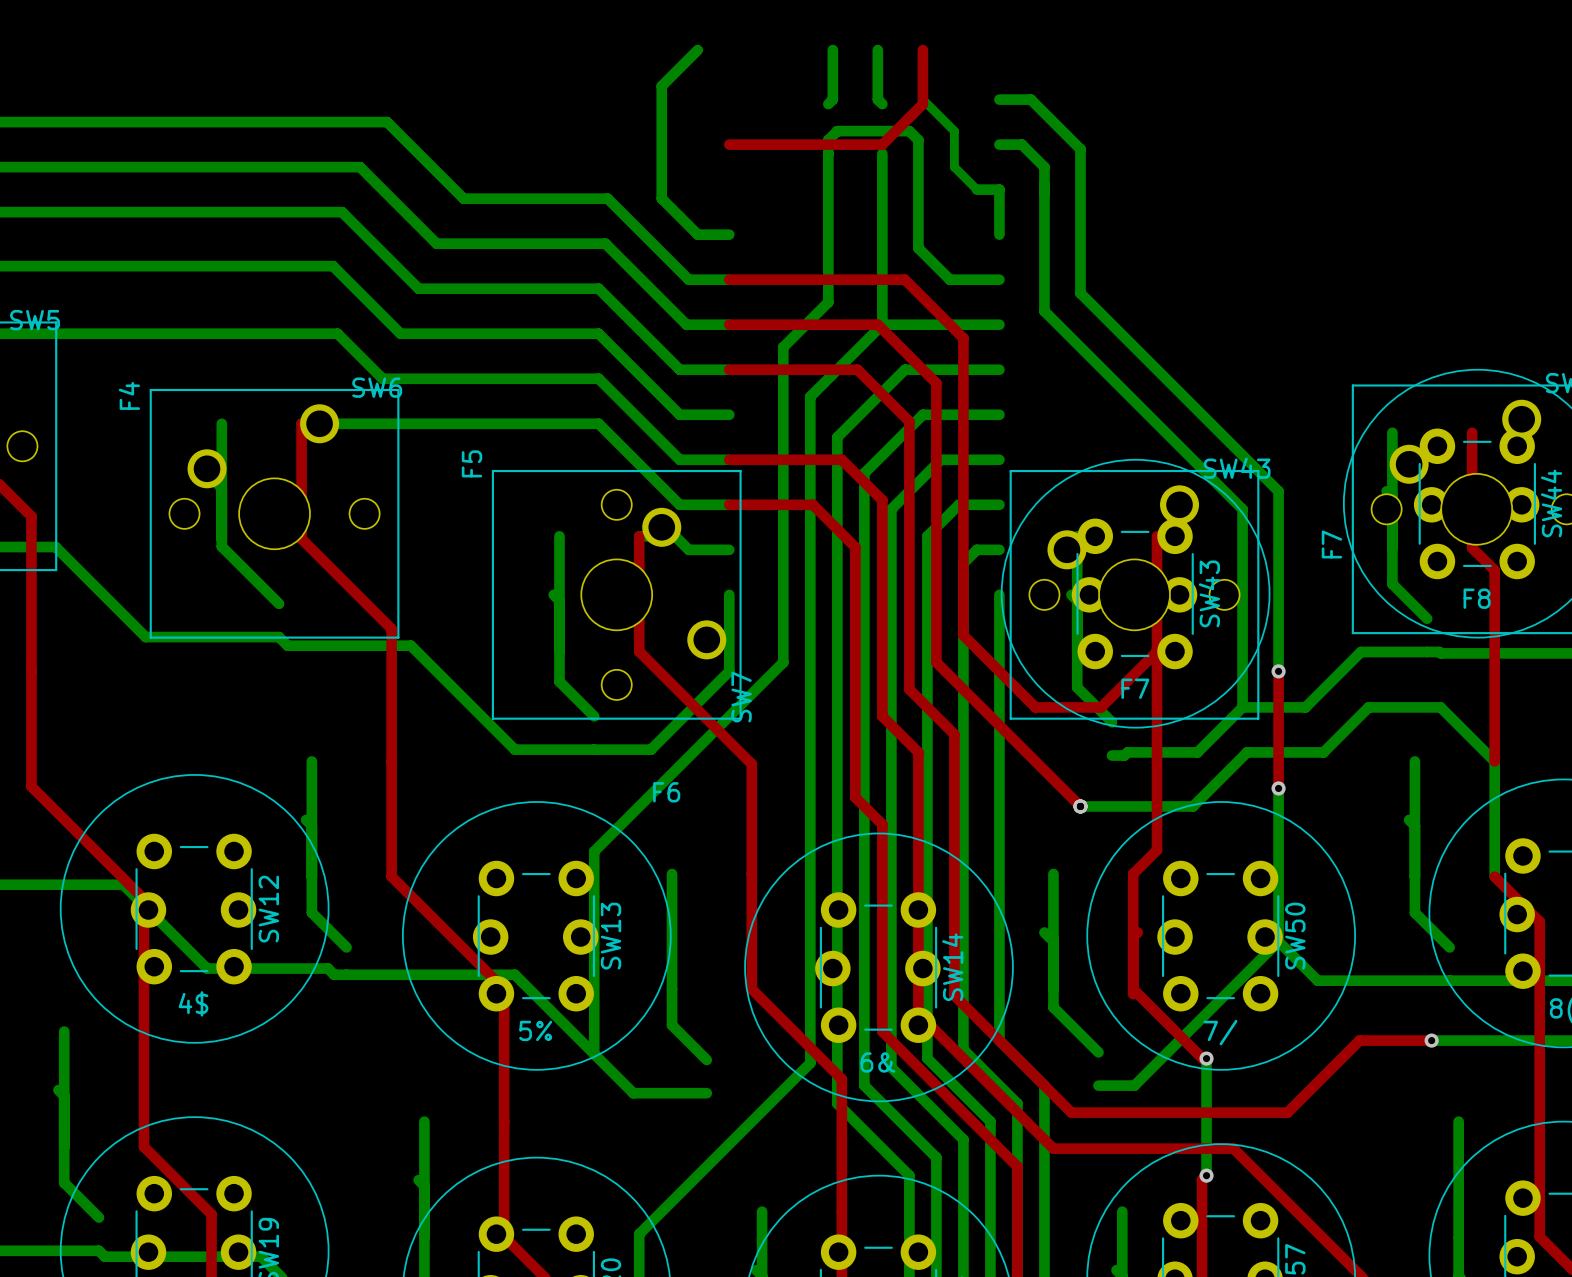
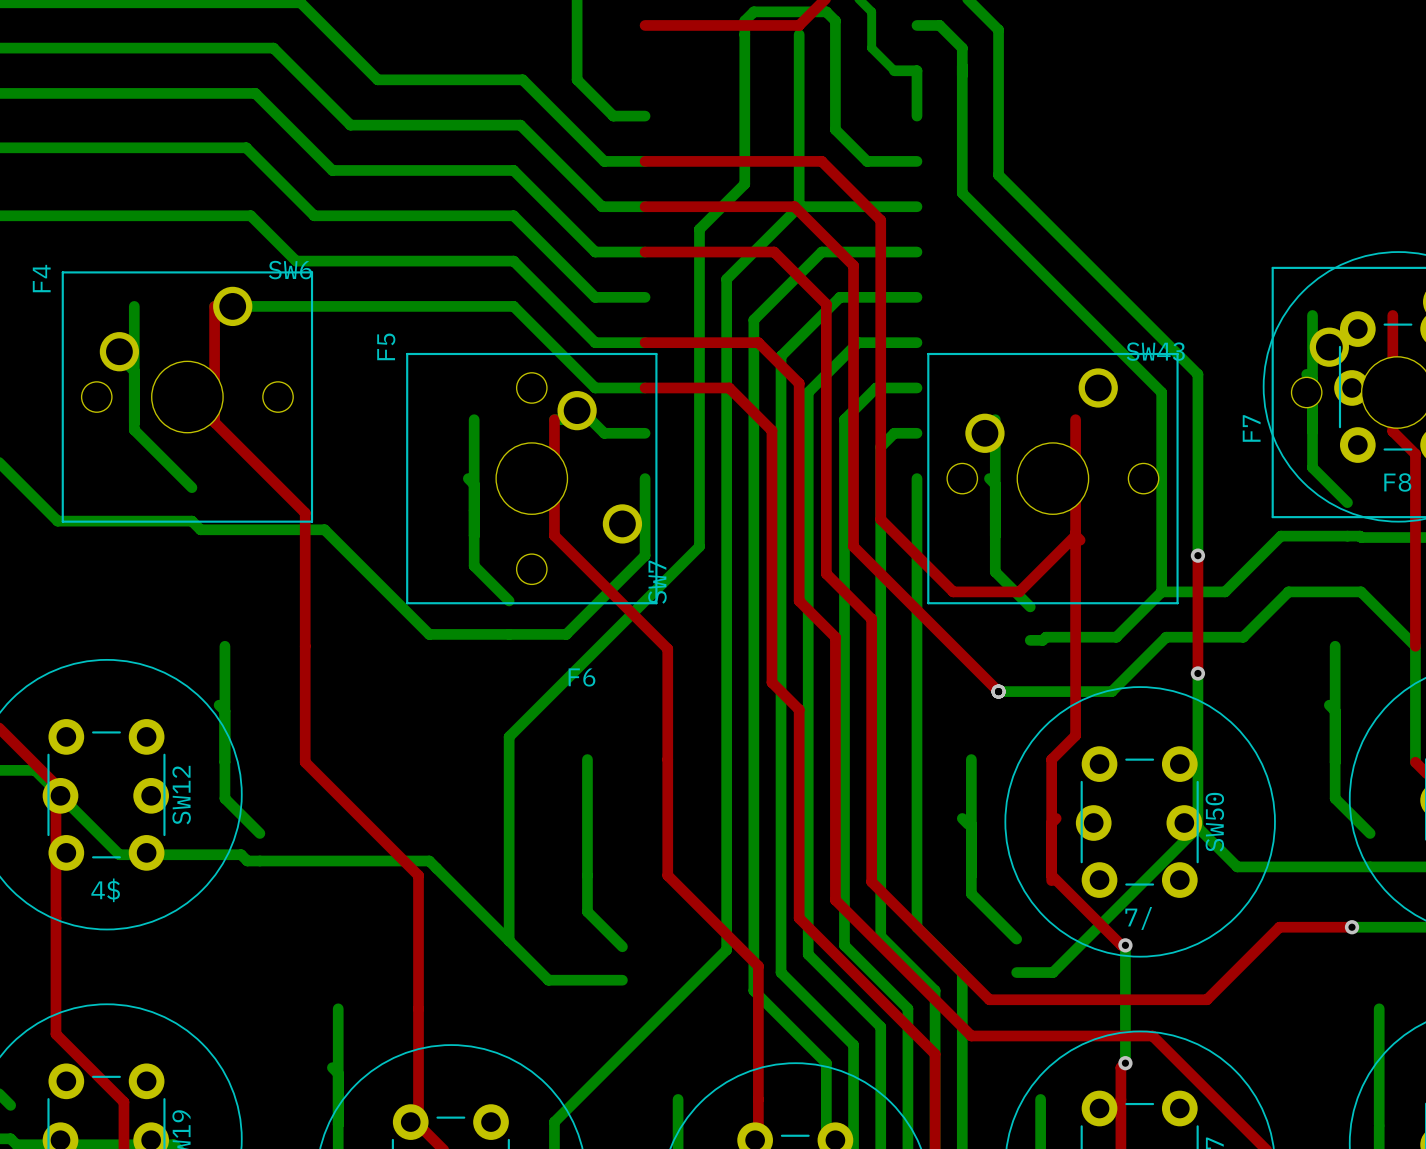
SW43: F7 (1135, 593) -> none
SW13: 5% (536, 935) -> none
SW14: 6& (878, 967) -> none

